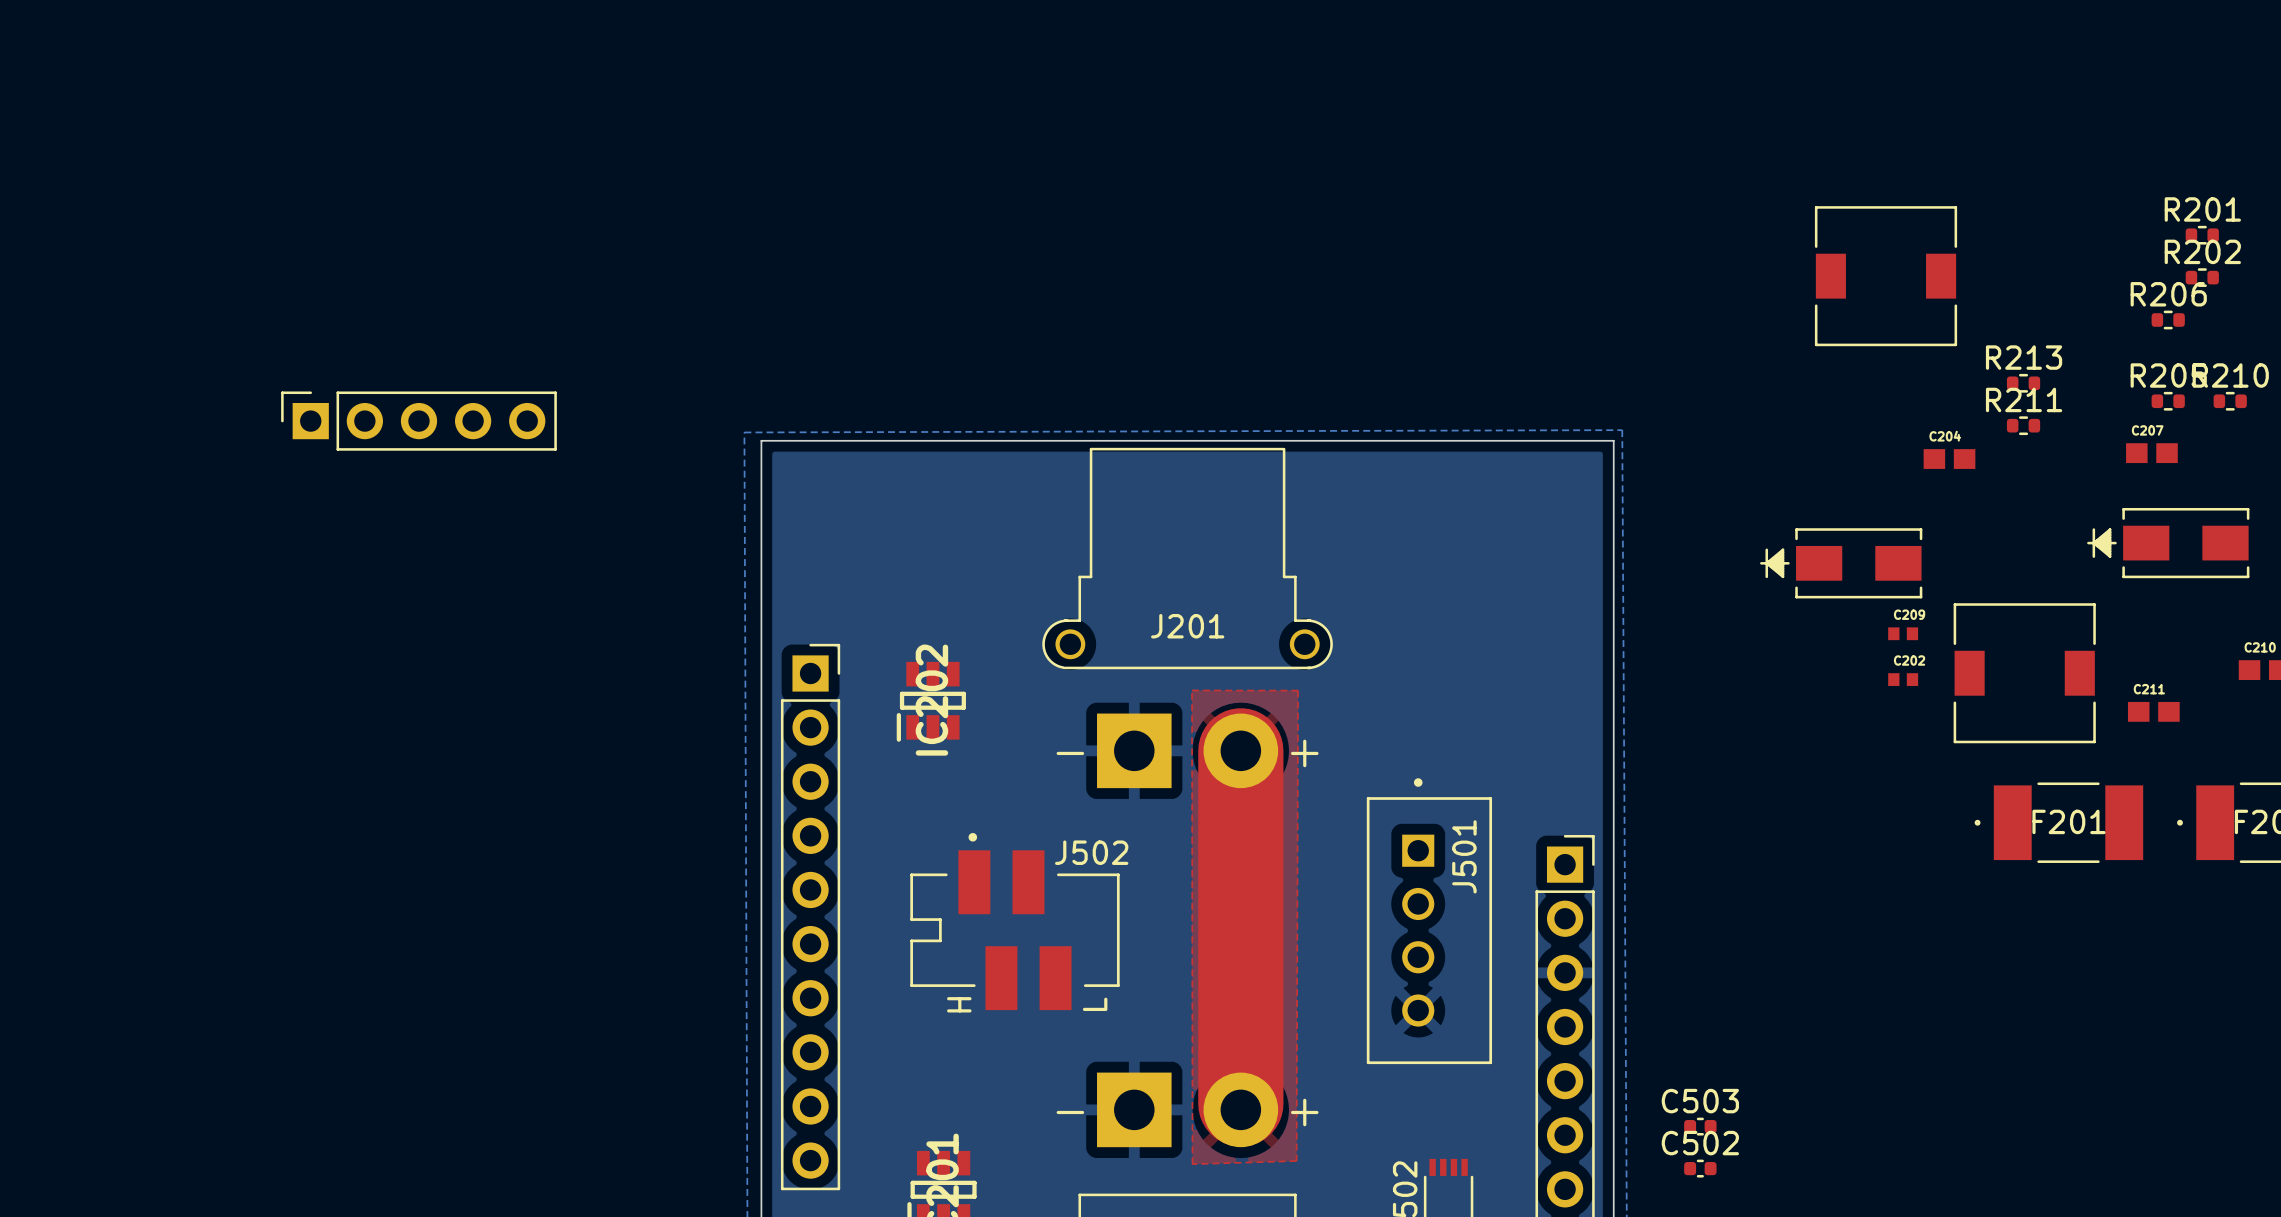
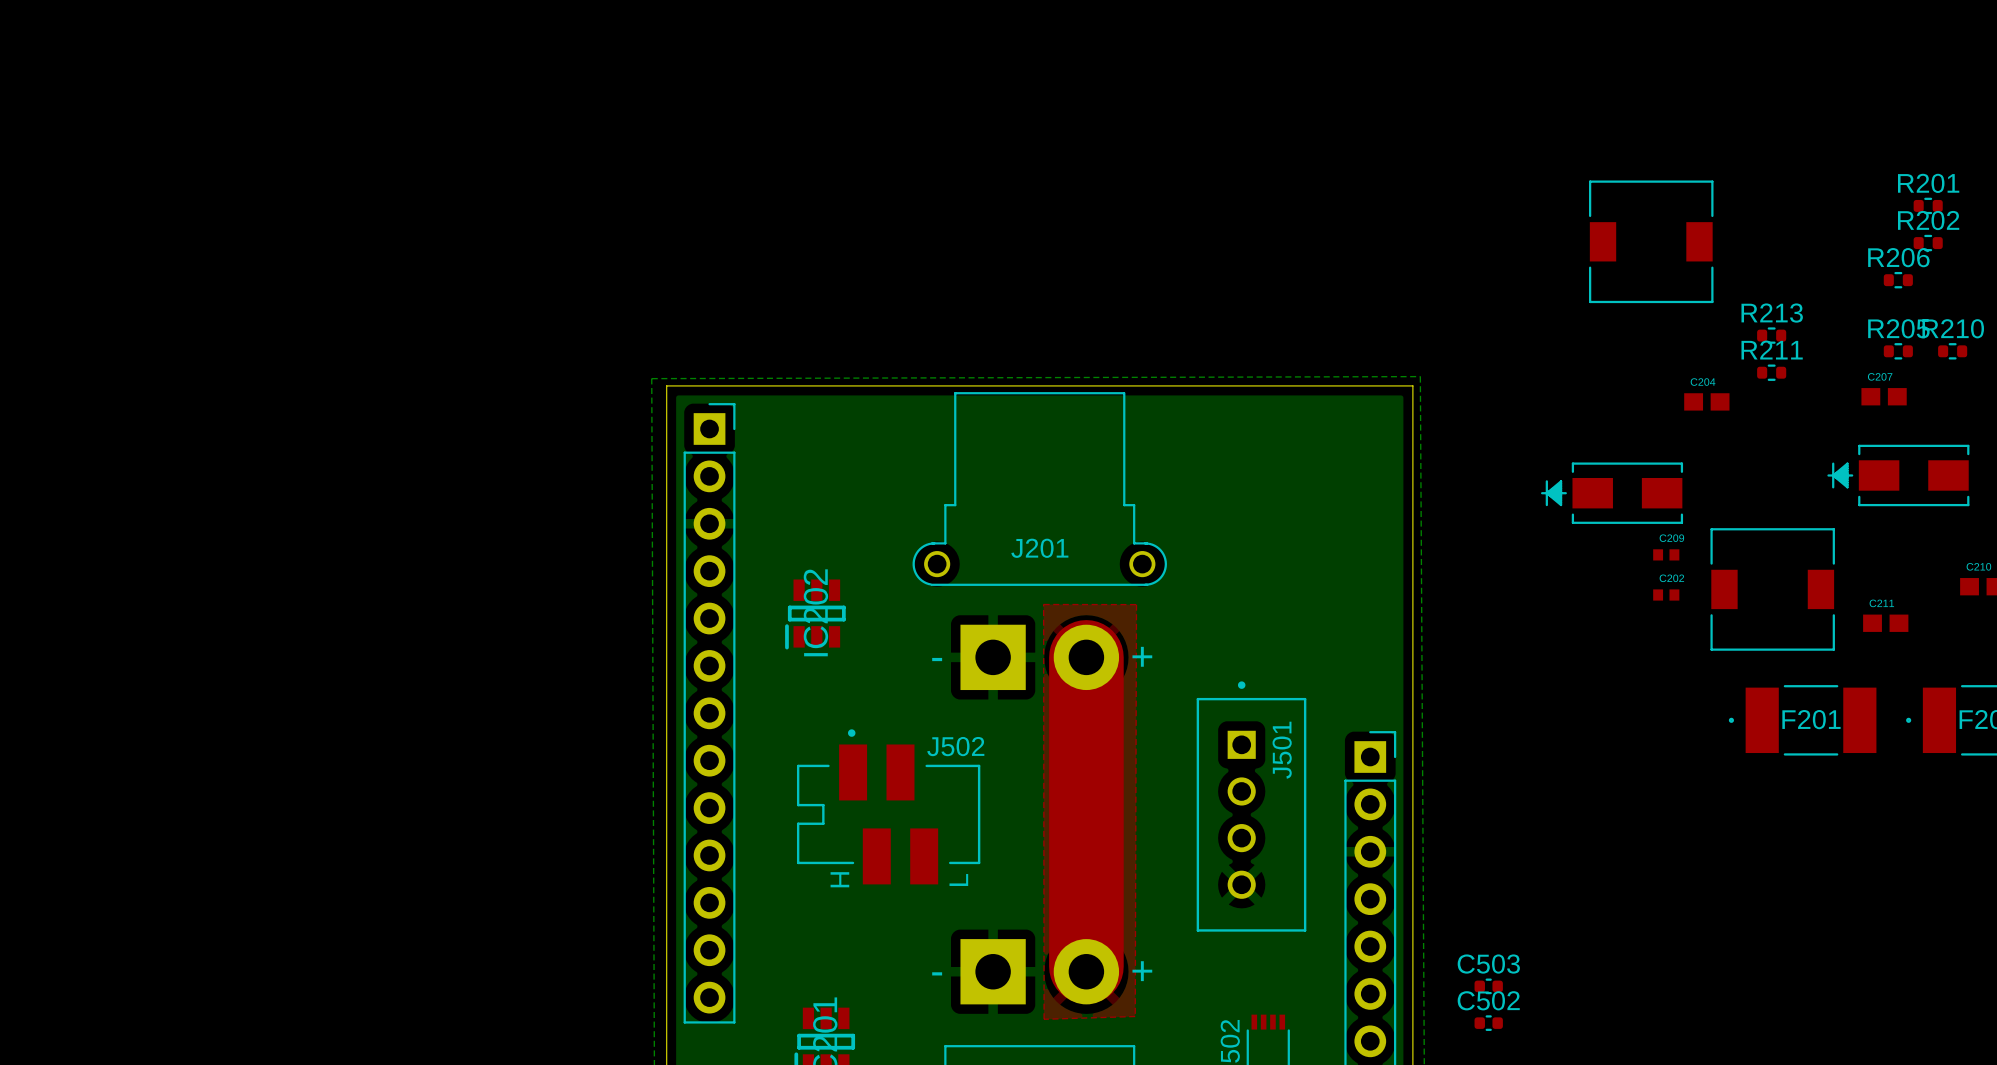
part: (418, 421) -> none
part: none -> (709, 713)
part: (810, 917) -> none

